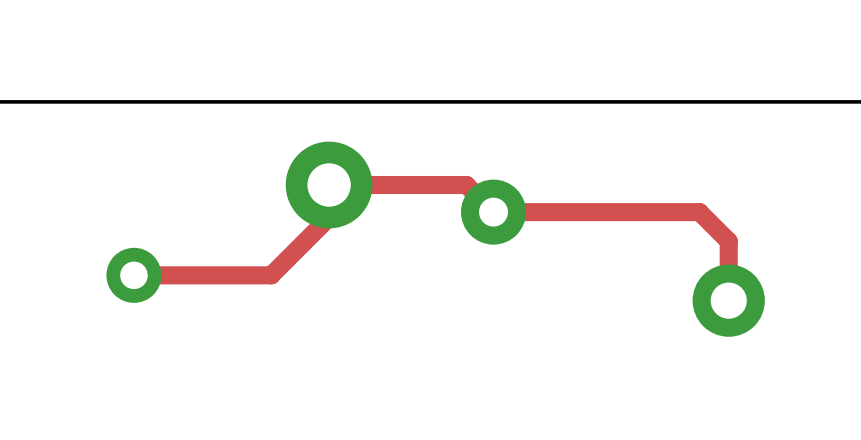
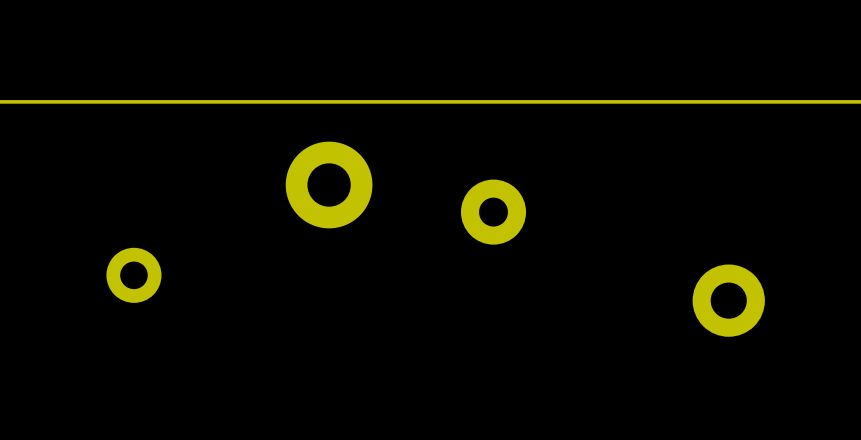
top track: (133, 275) (271, 275) (329, 217) (329, 185) (466, 185) (493, 212) (699, 212) (728, 241) (728, 300) -> none

